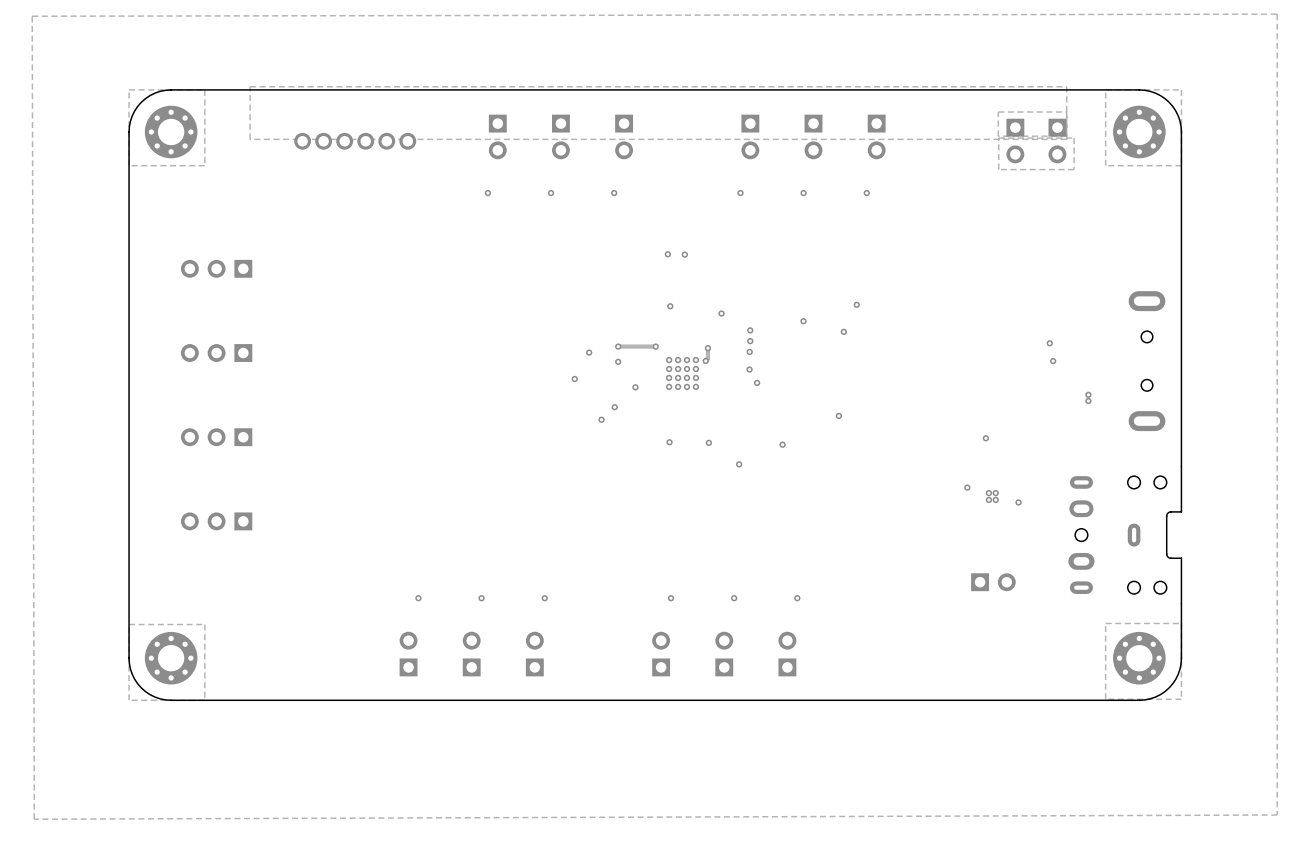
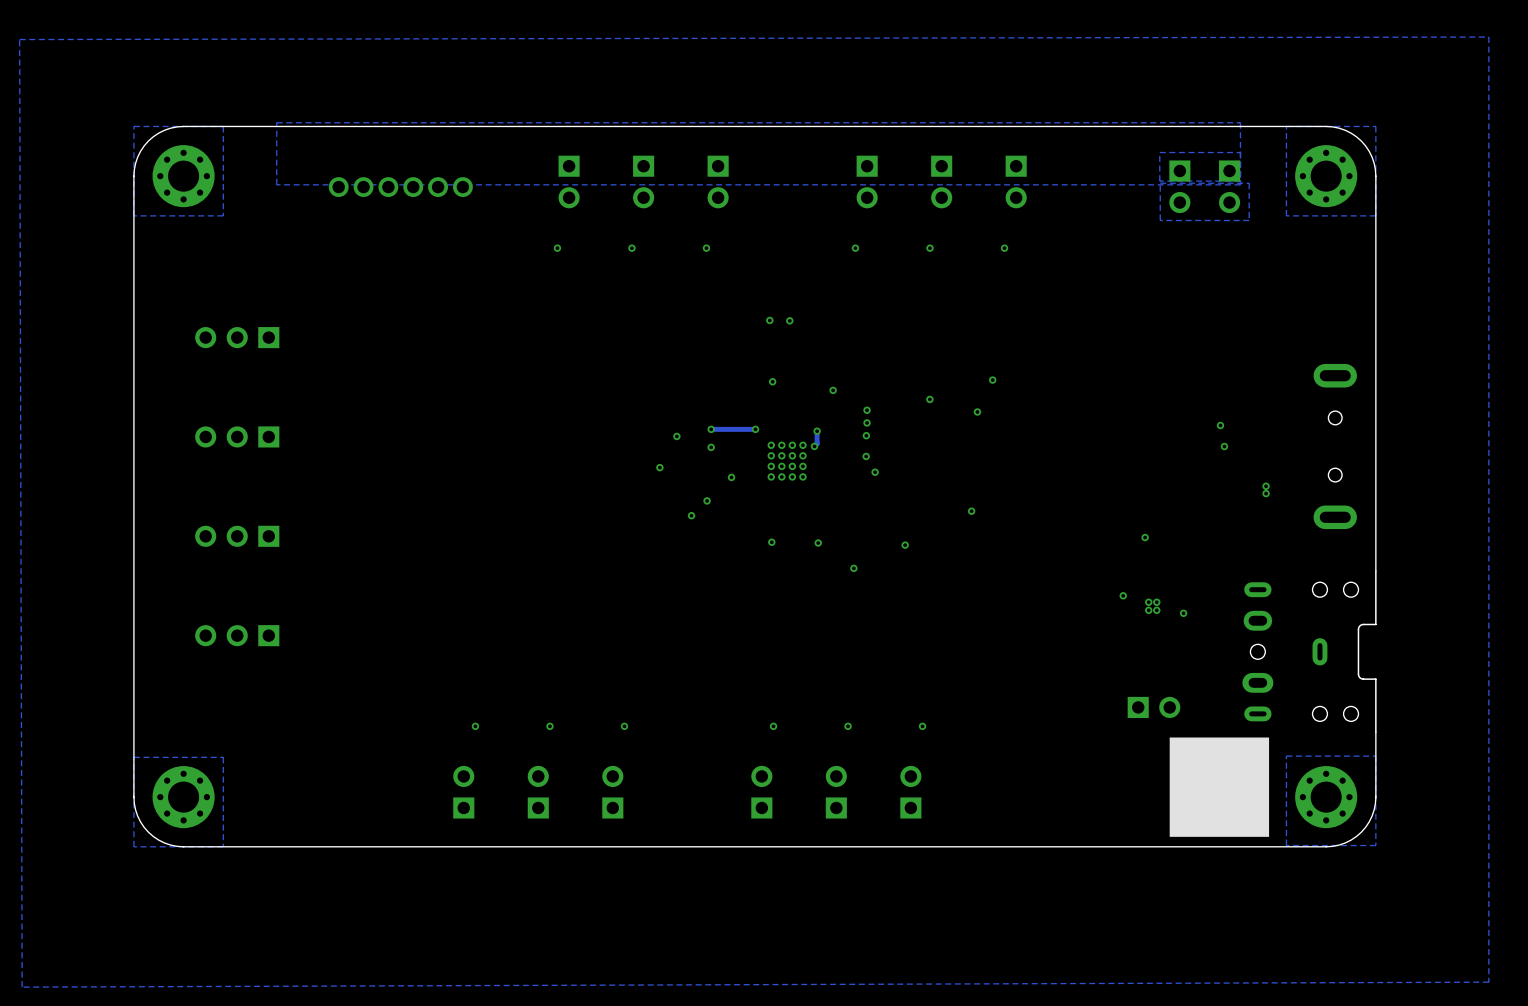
drawing: none -> [1169, 737, 1270, 837]

